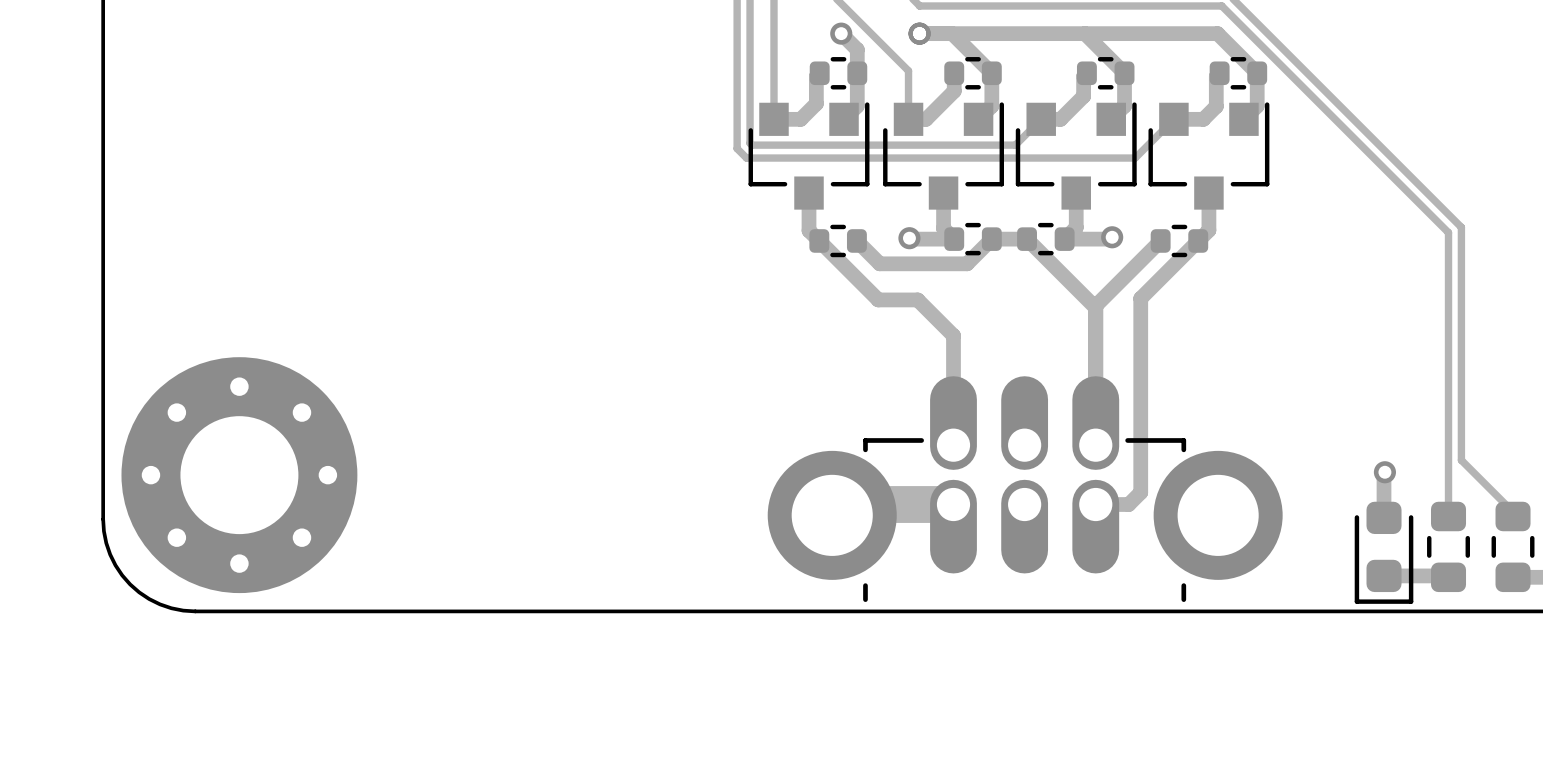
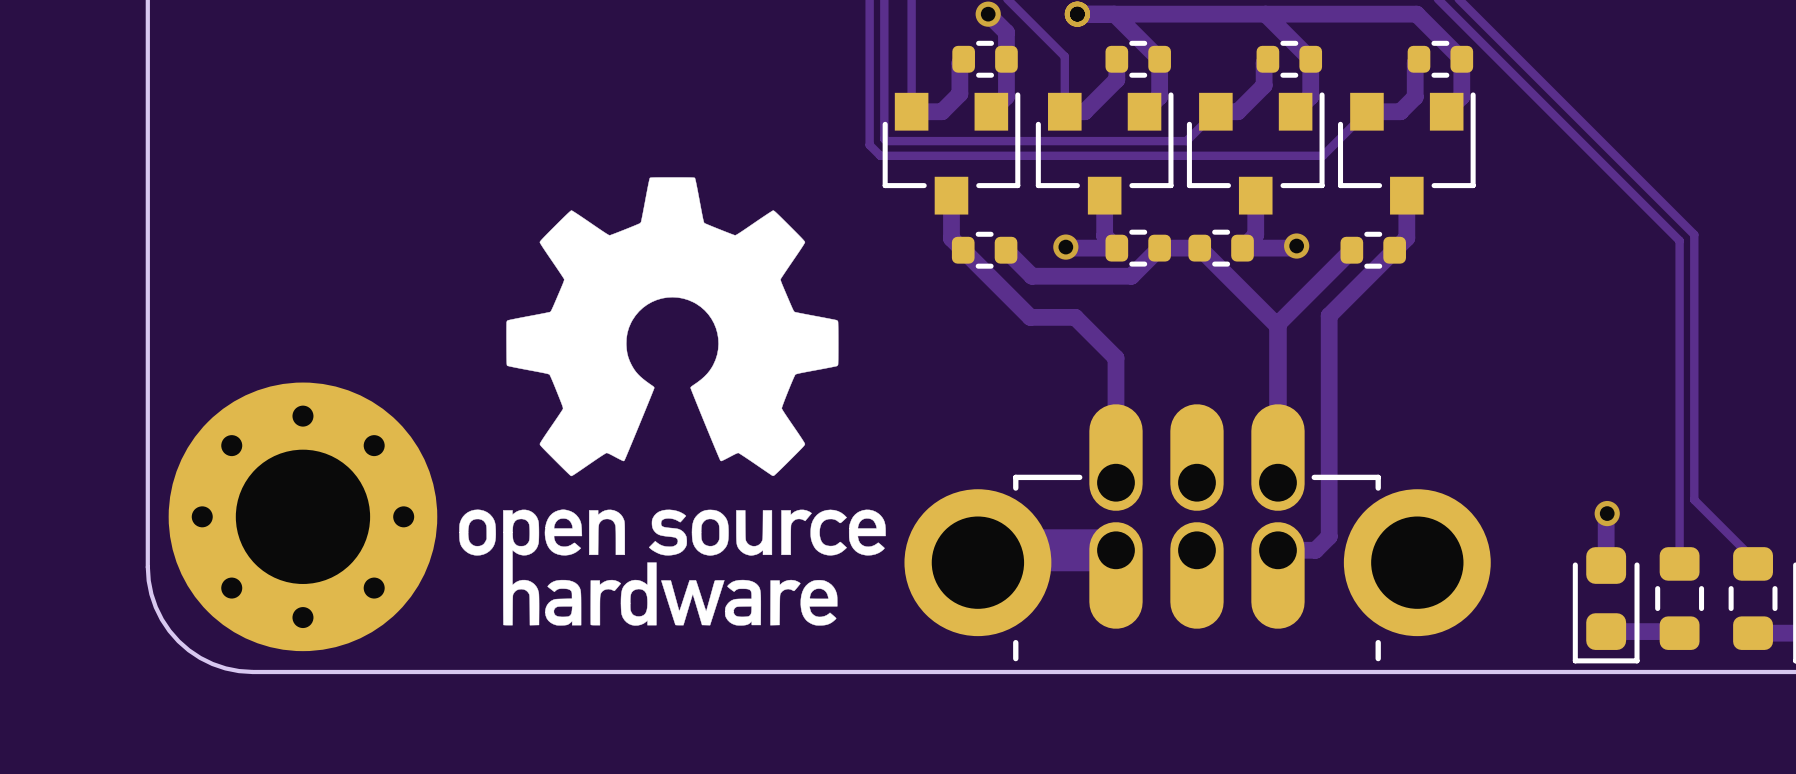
drawing: none -> [459, 177, 886, 626]

